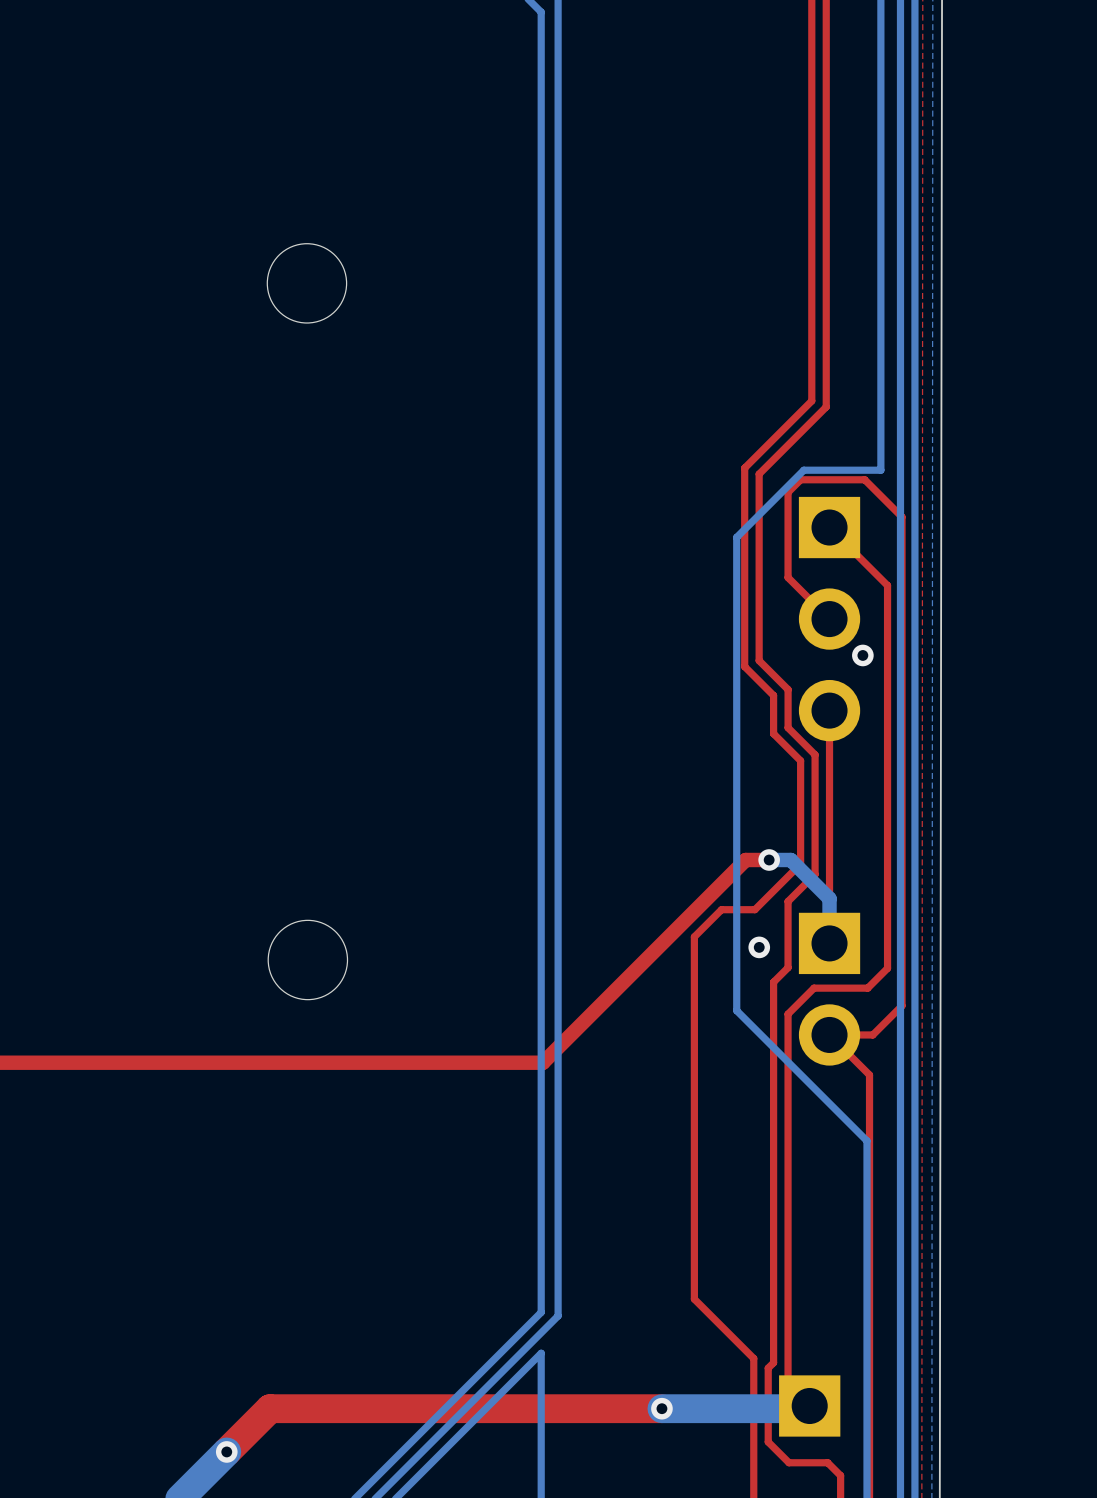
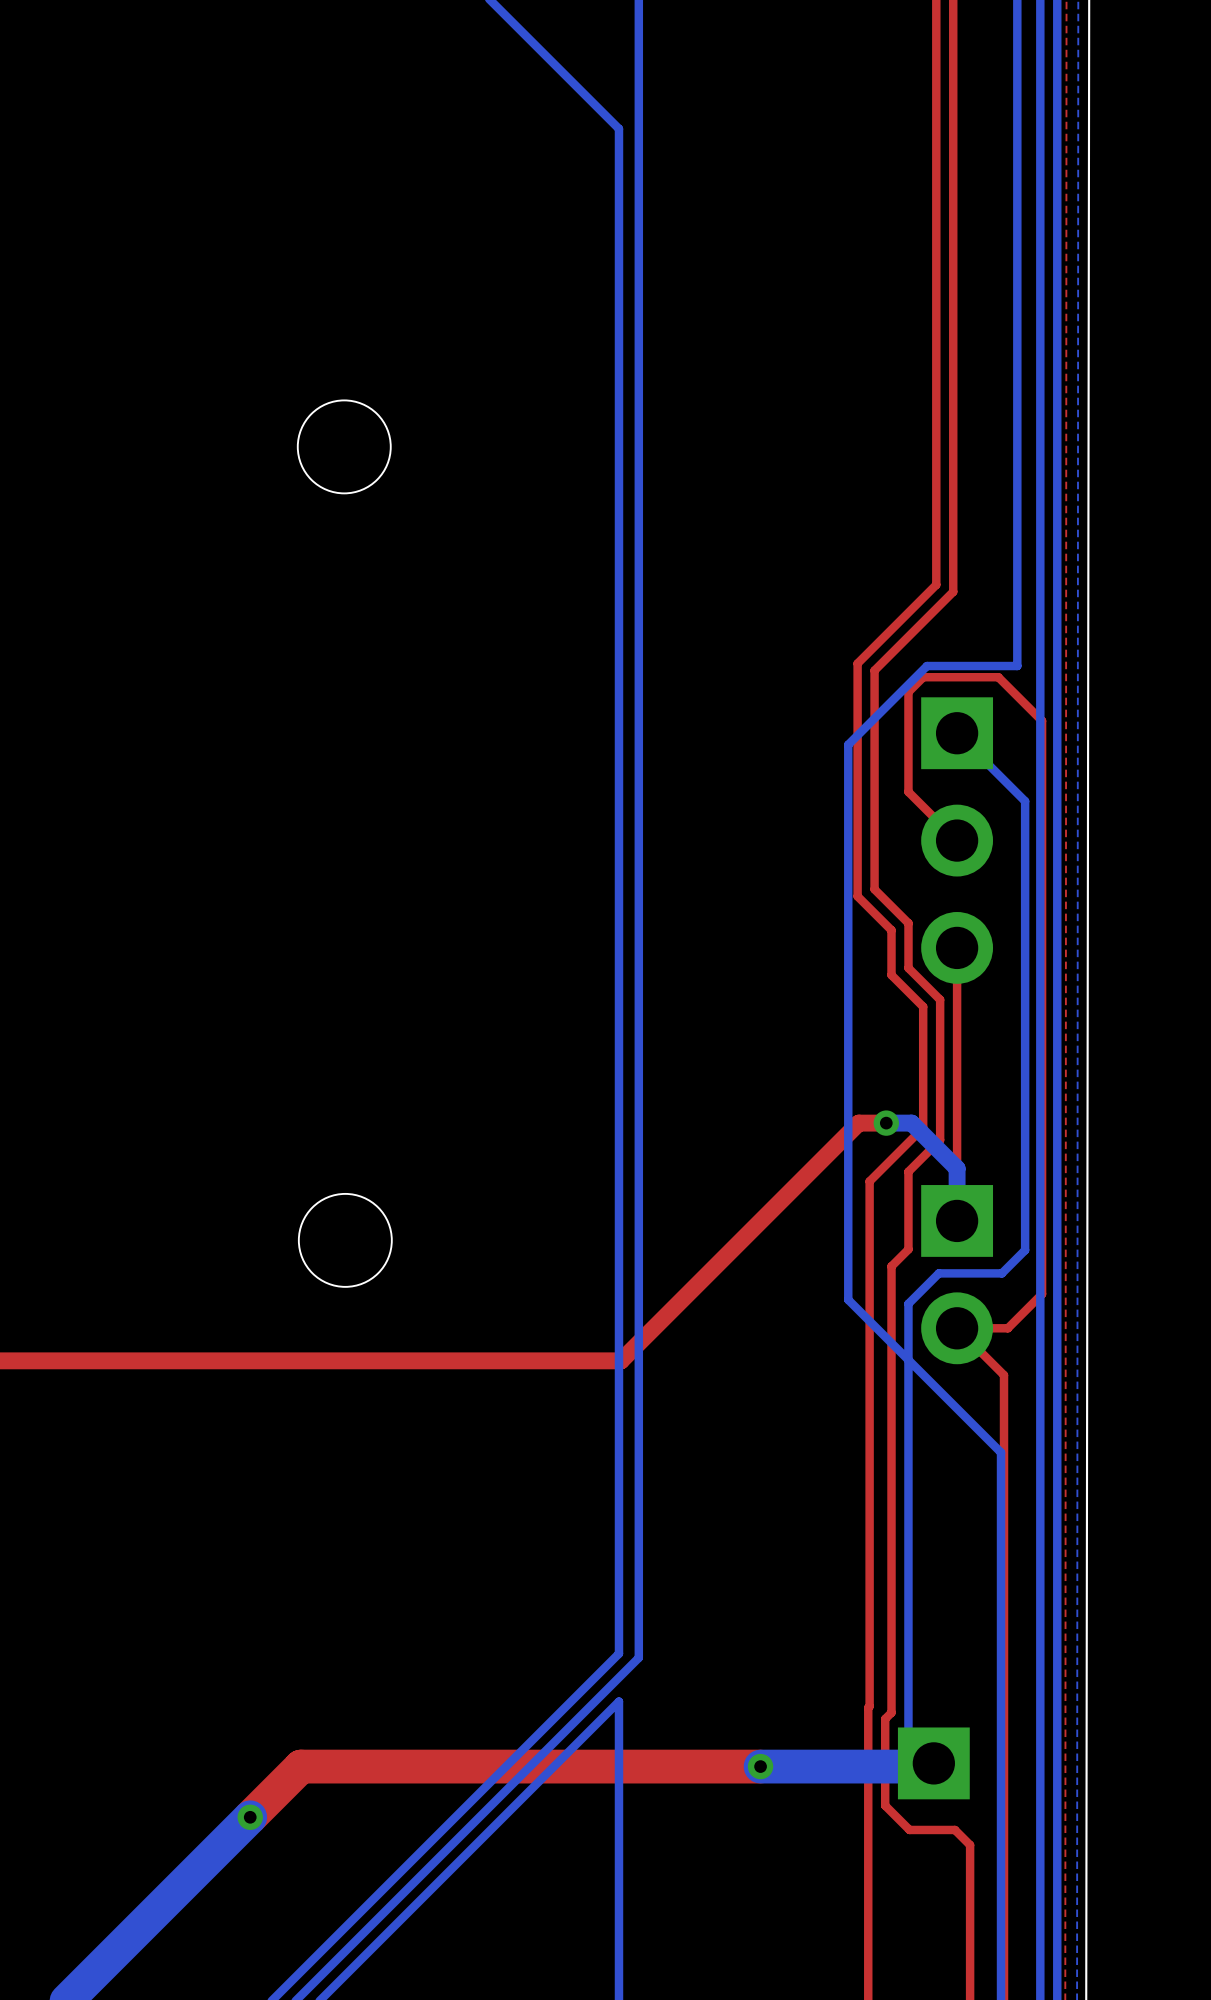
top track: (829, 527) (887, 585) (887, 968) (867, 988) (813, 988) (788, 1014) (788, 1384) (809, 1405) -> none
bottom track: none -> (957, 733) (1025, 801) (1025, 1250) (1001, 1273) (938, 1273) (908, 1303) (908, 1738) (933, 1763)
via: (862, 655) -> none
top track: (754, 909) (721, 909) (694, 936) (694, 1299) (753, 1358) -> (869, 1181) (868, 1707)
via: (759, 947) -> none

